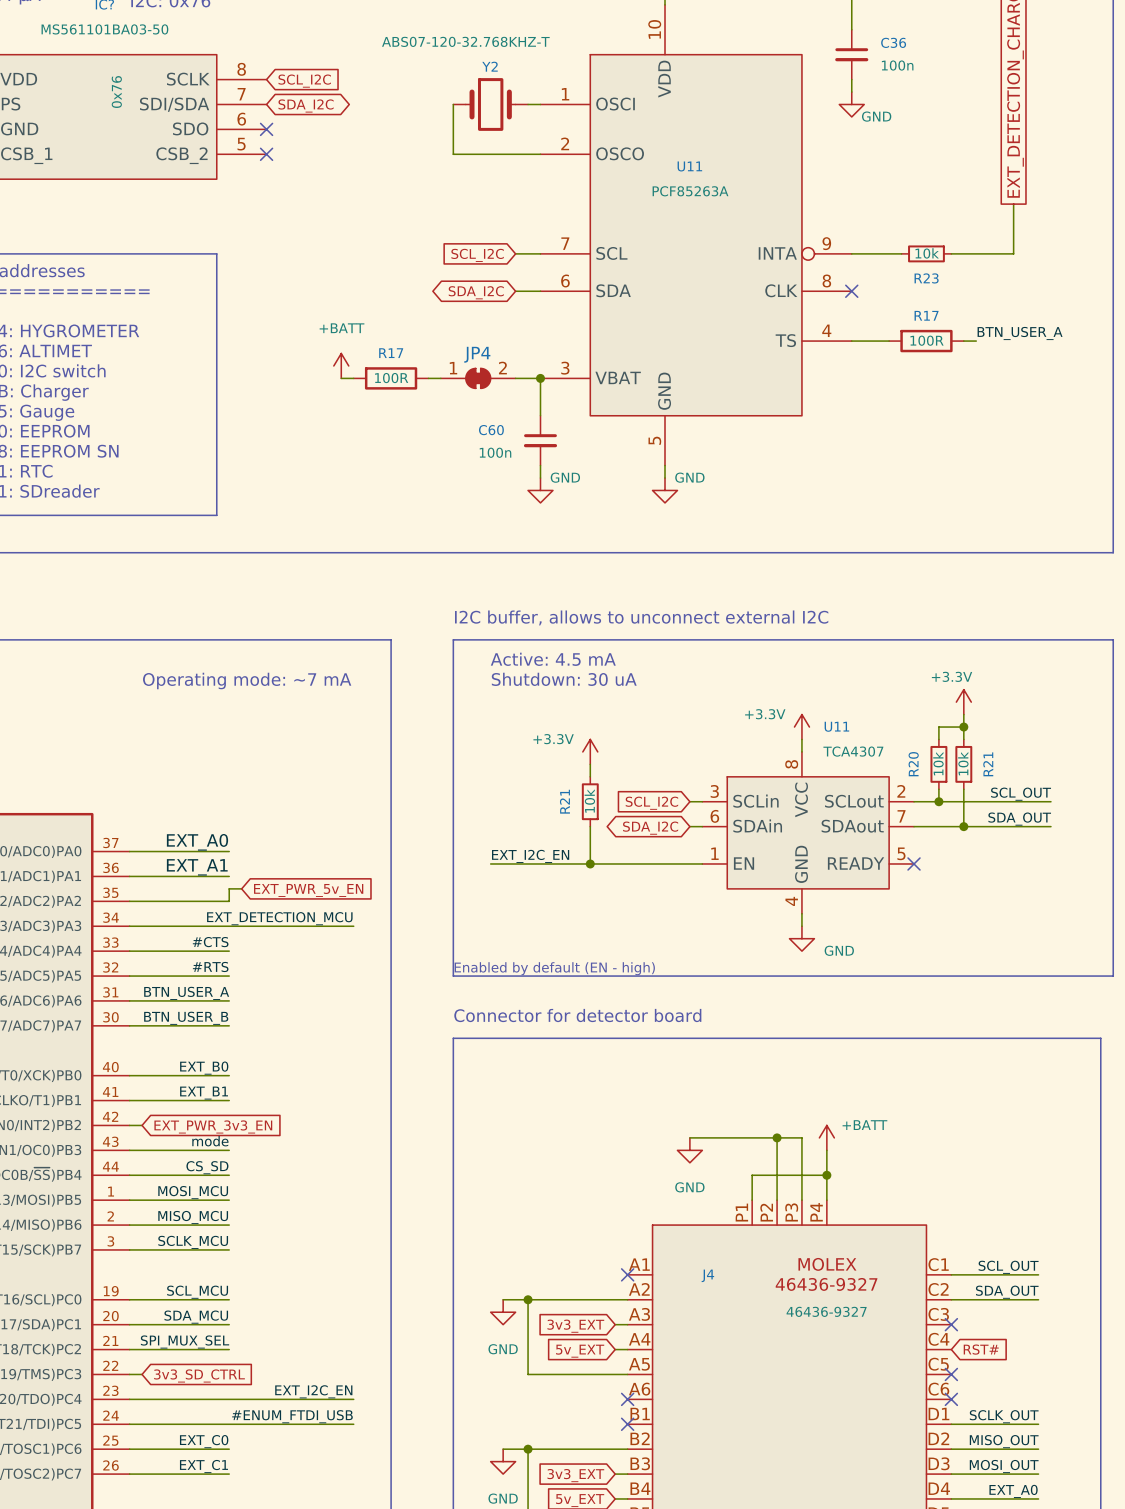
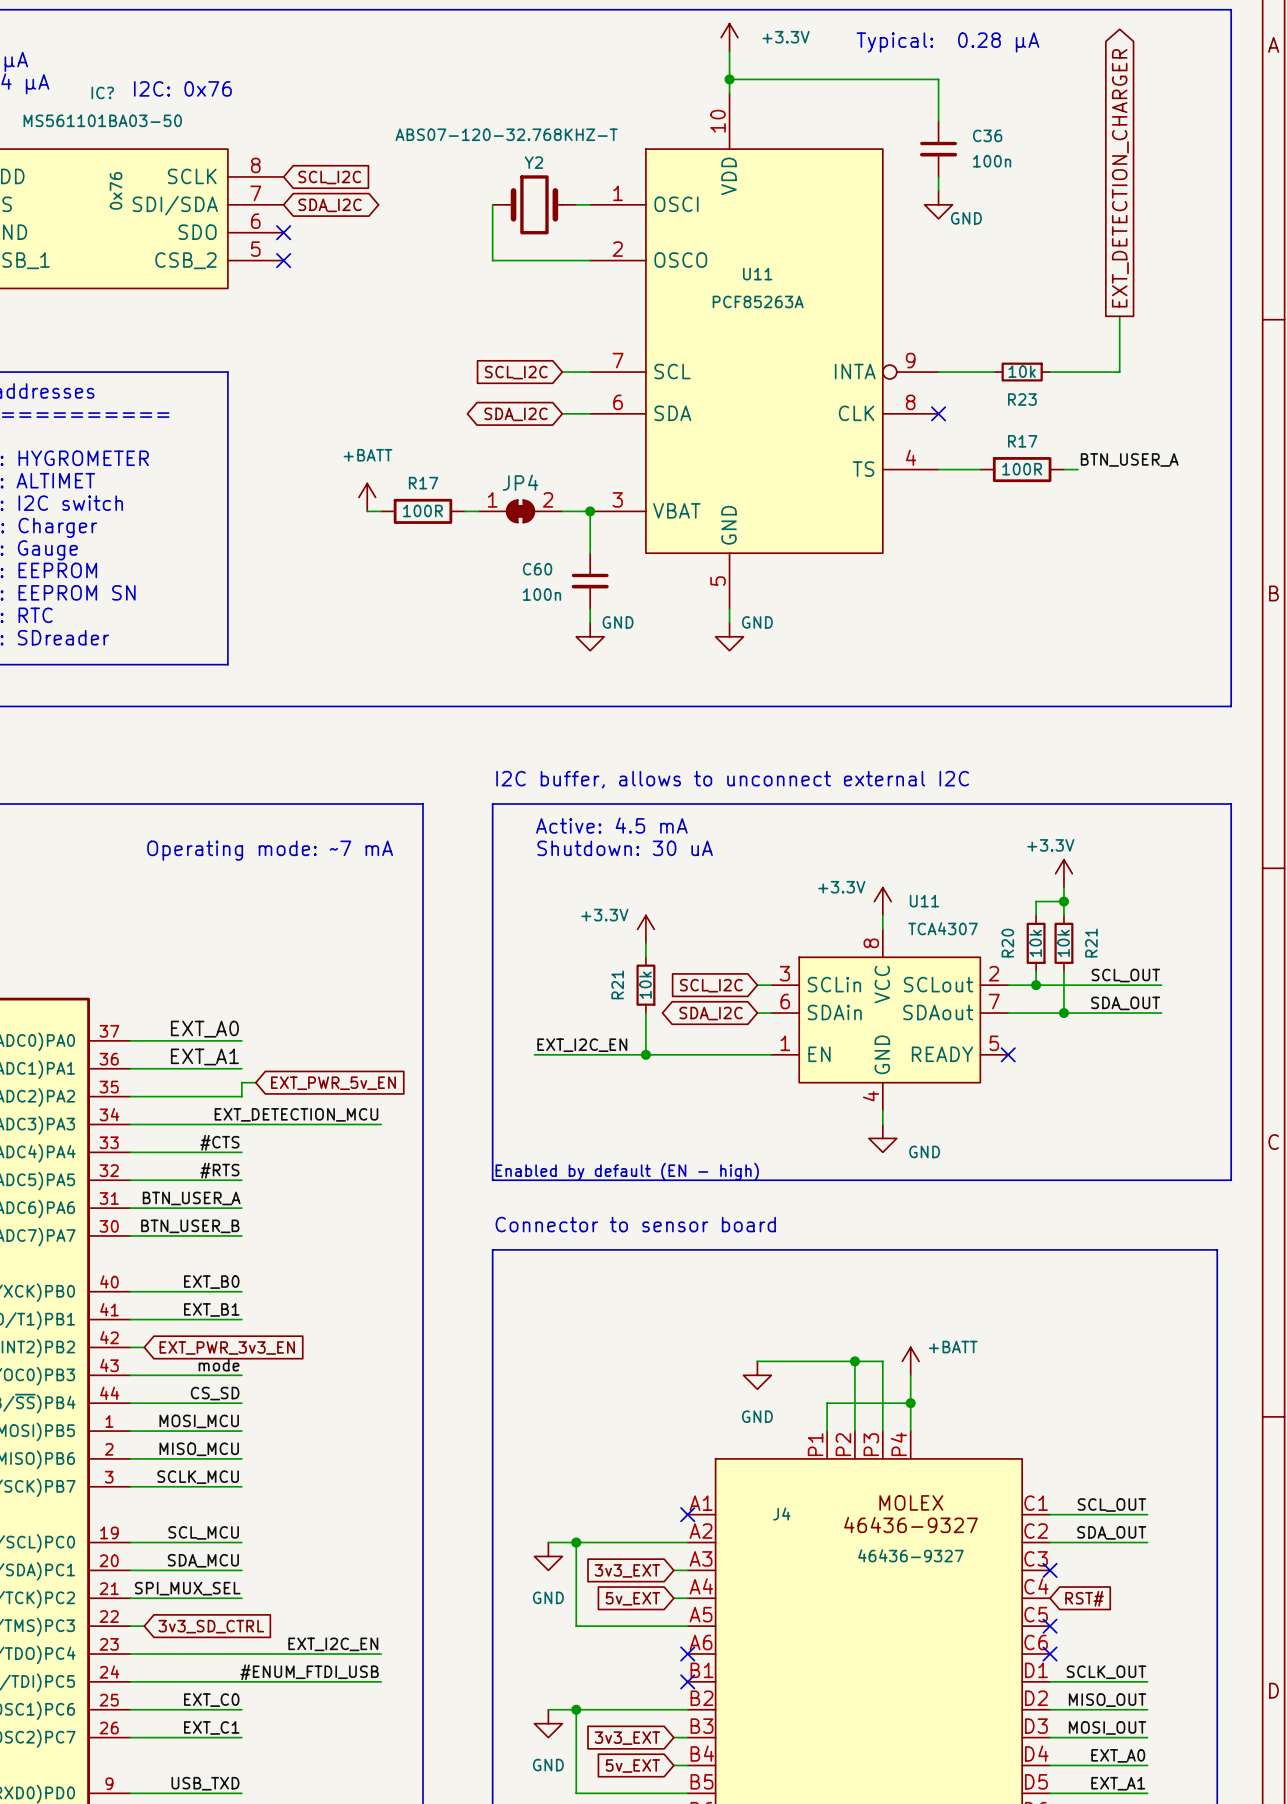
text: Connector for detector board (577, 1015) -> Connector to sensor board (635, 1224)

